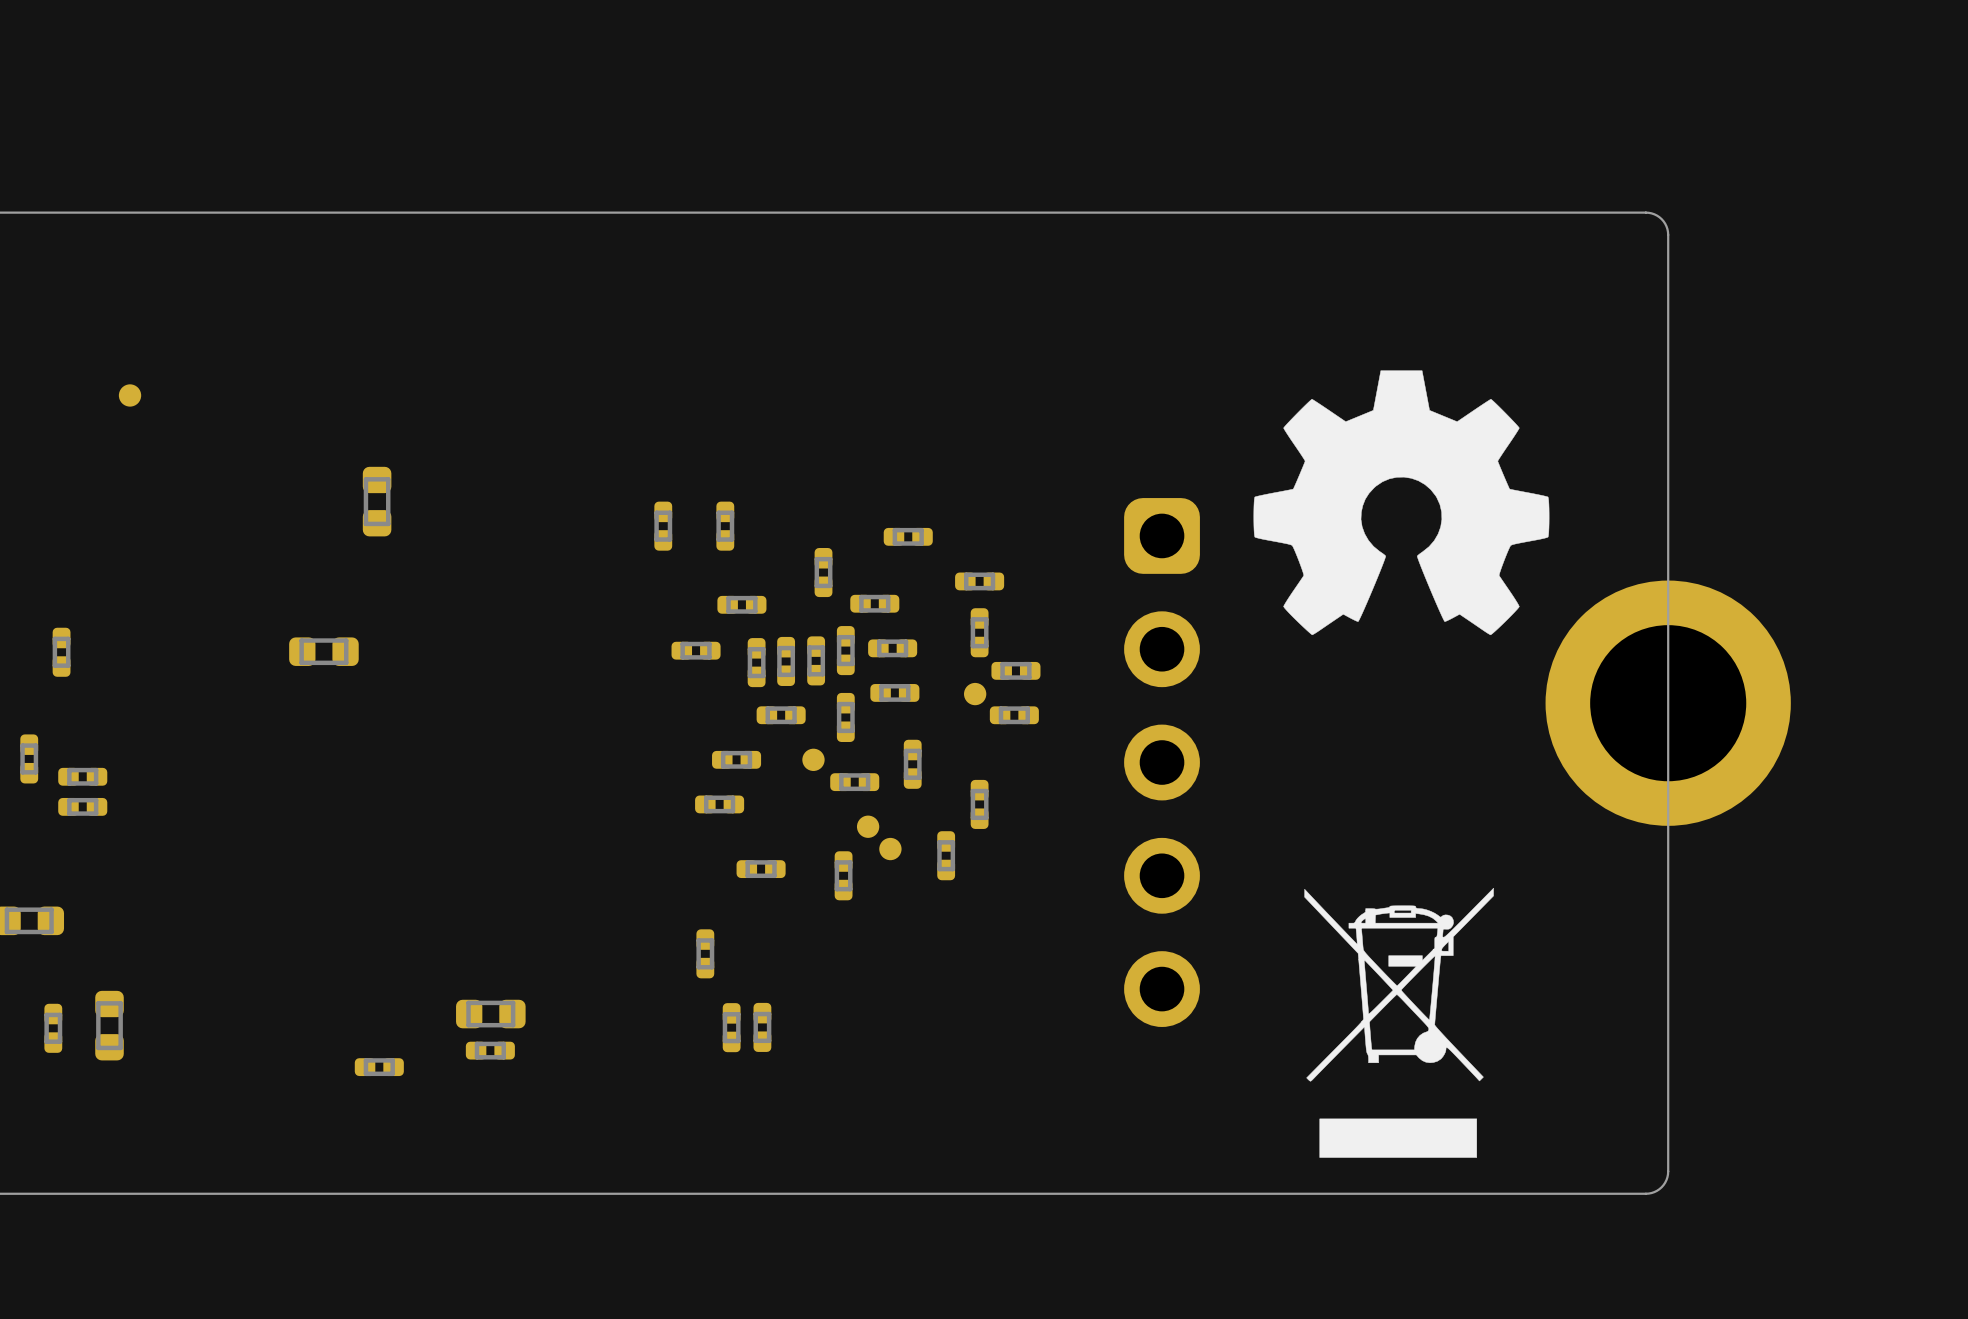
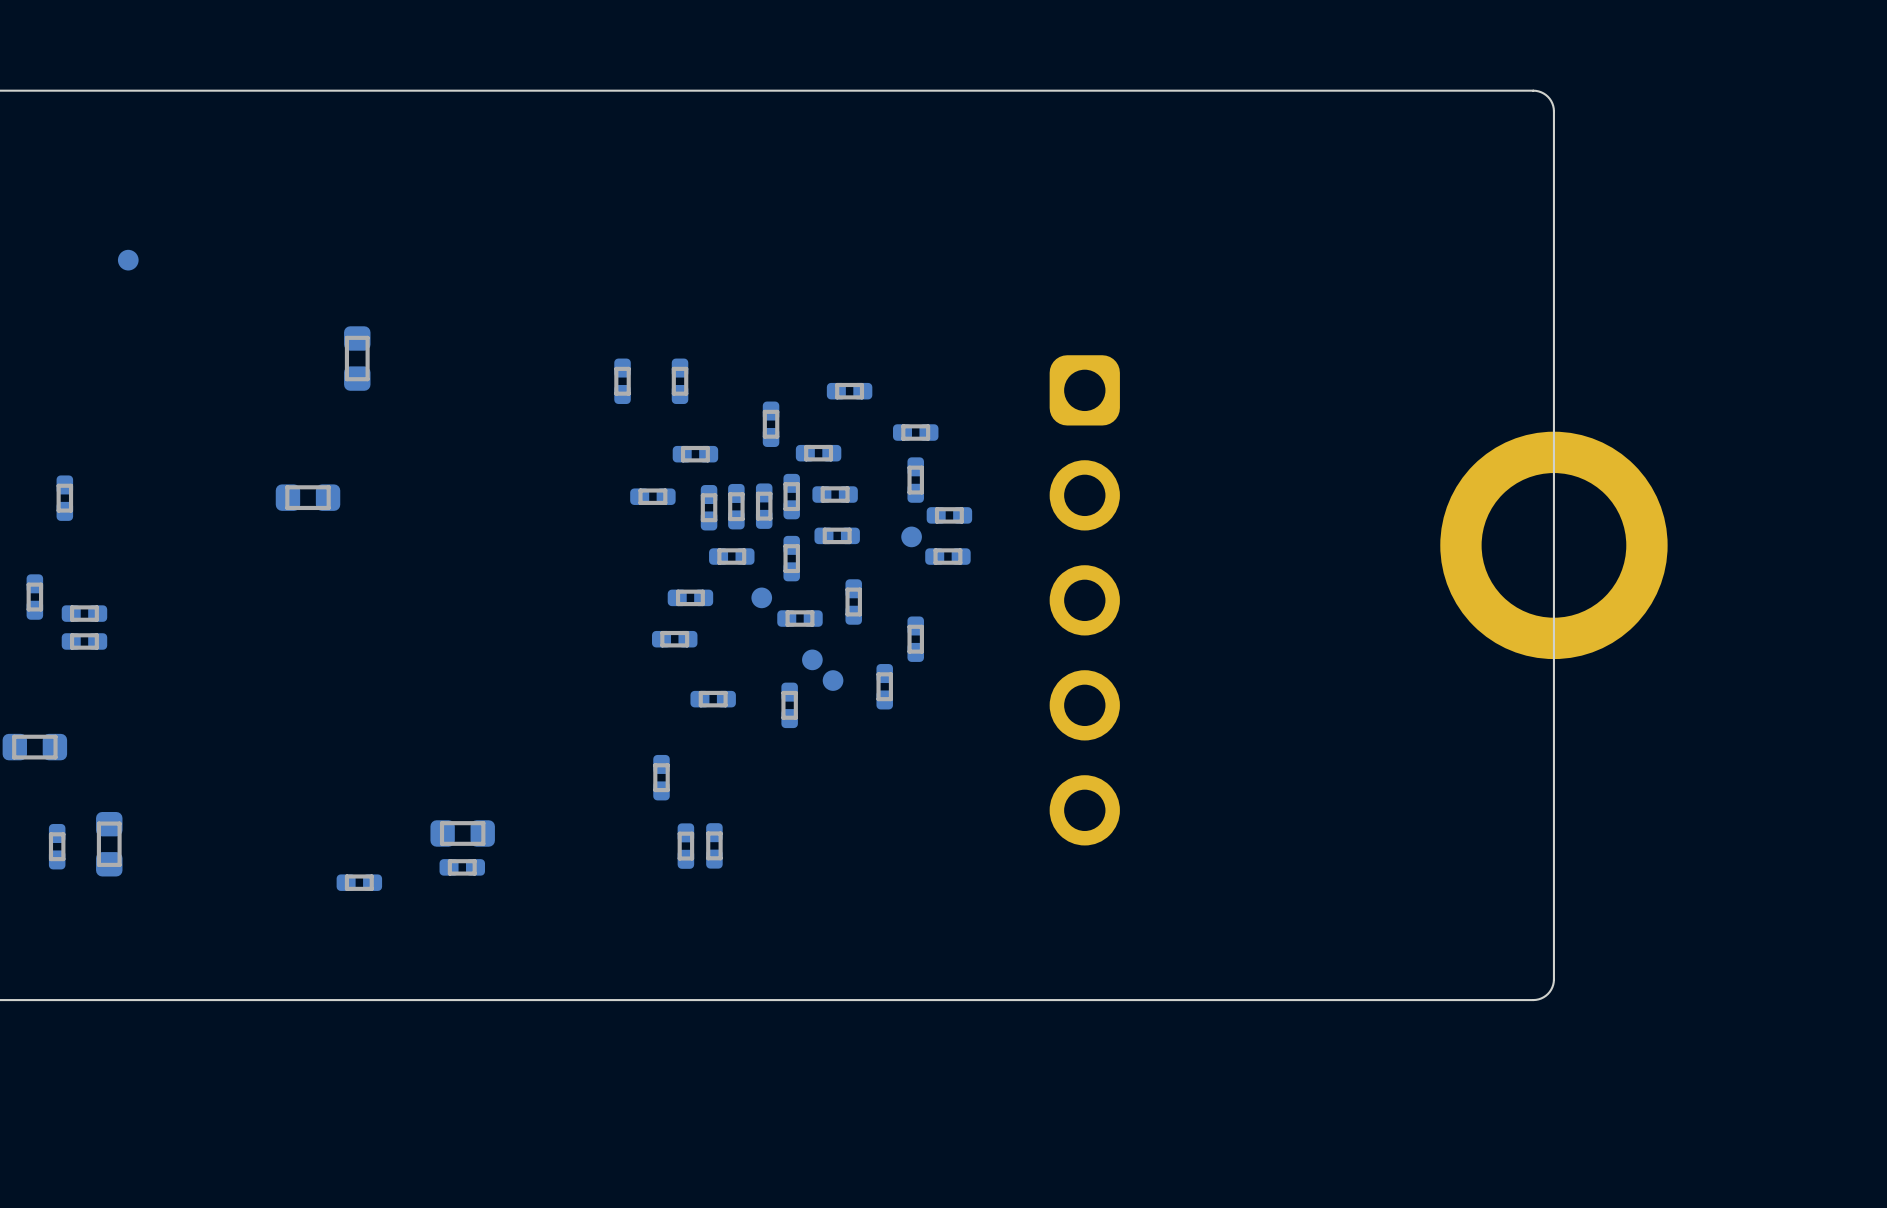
drawing: [1253, 370, 1550, 636] -> none
drawing: [1304, 887, 1494, 1158] -> none

